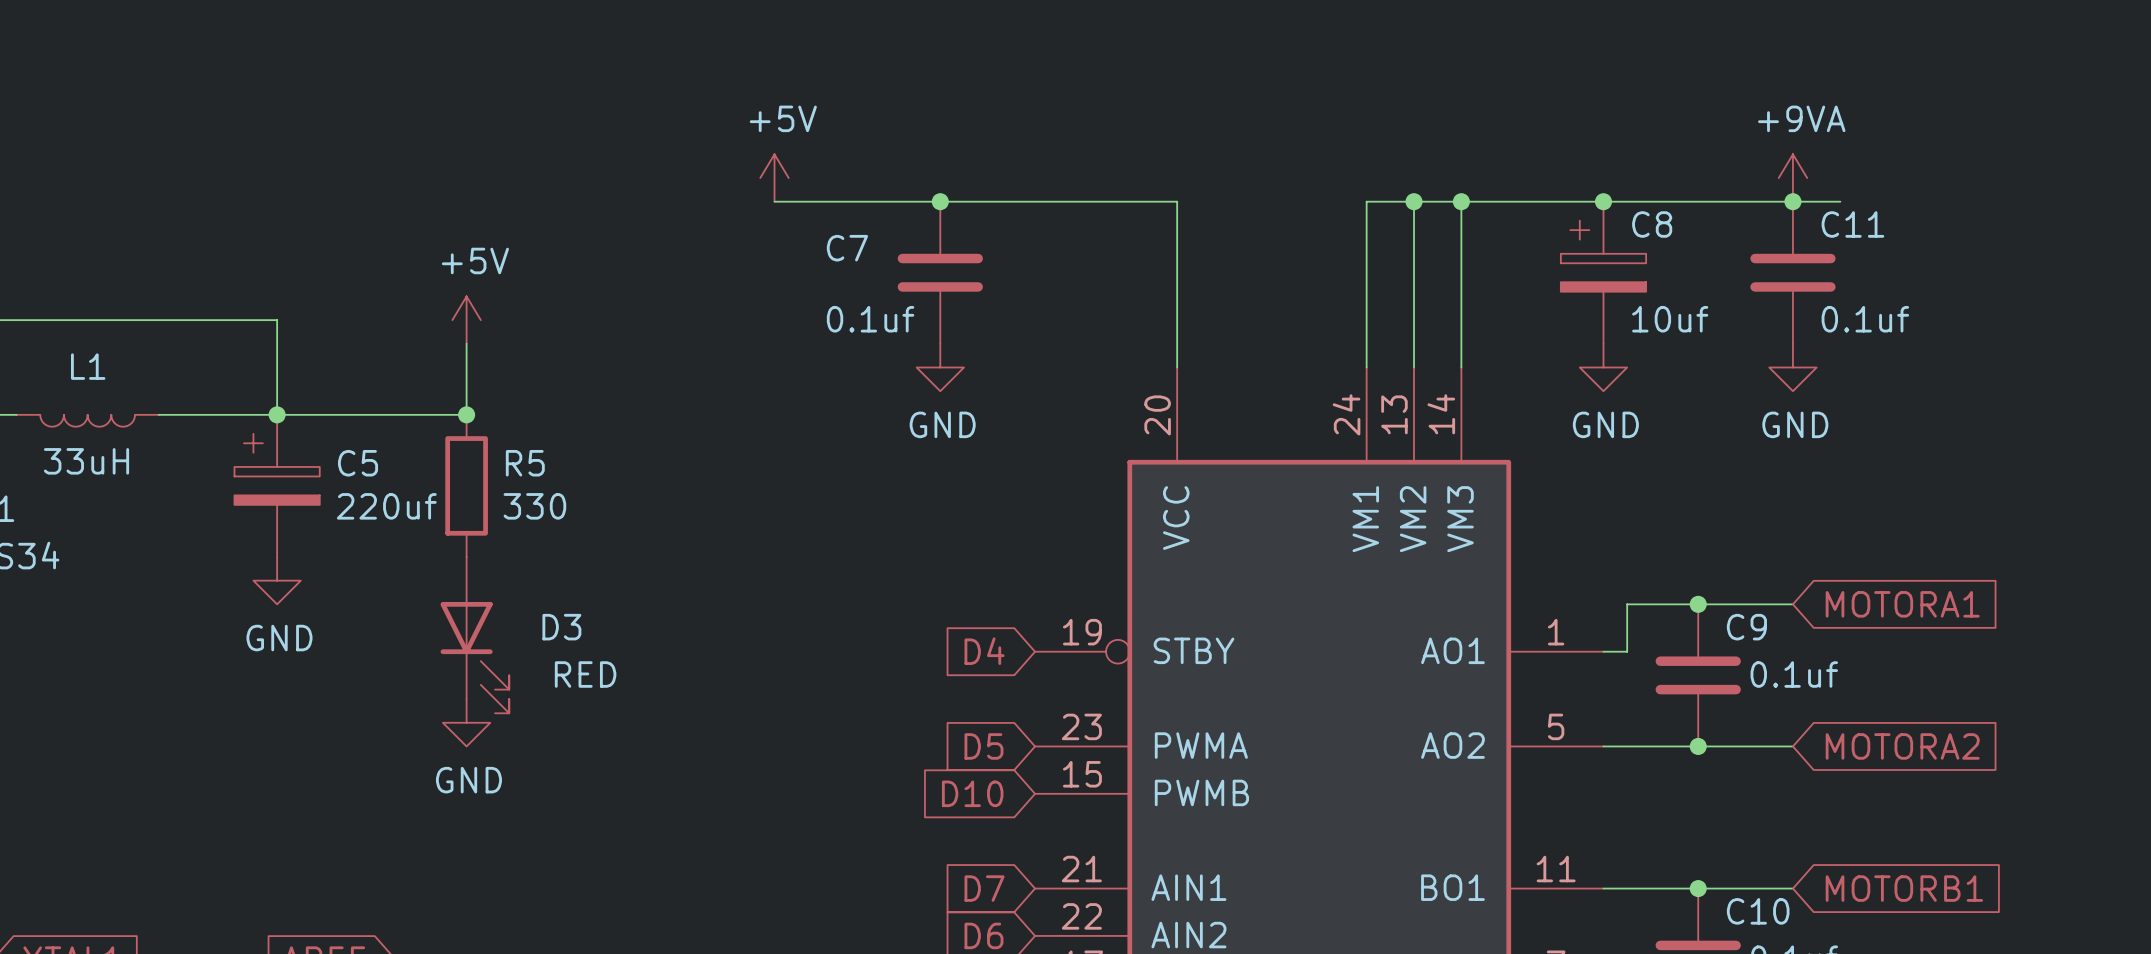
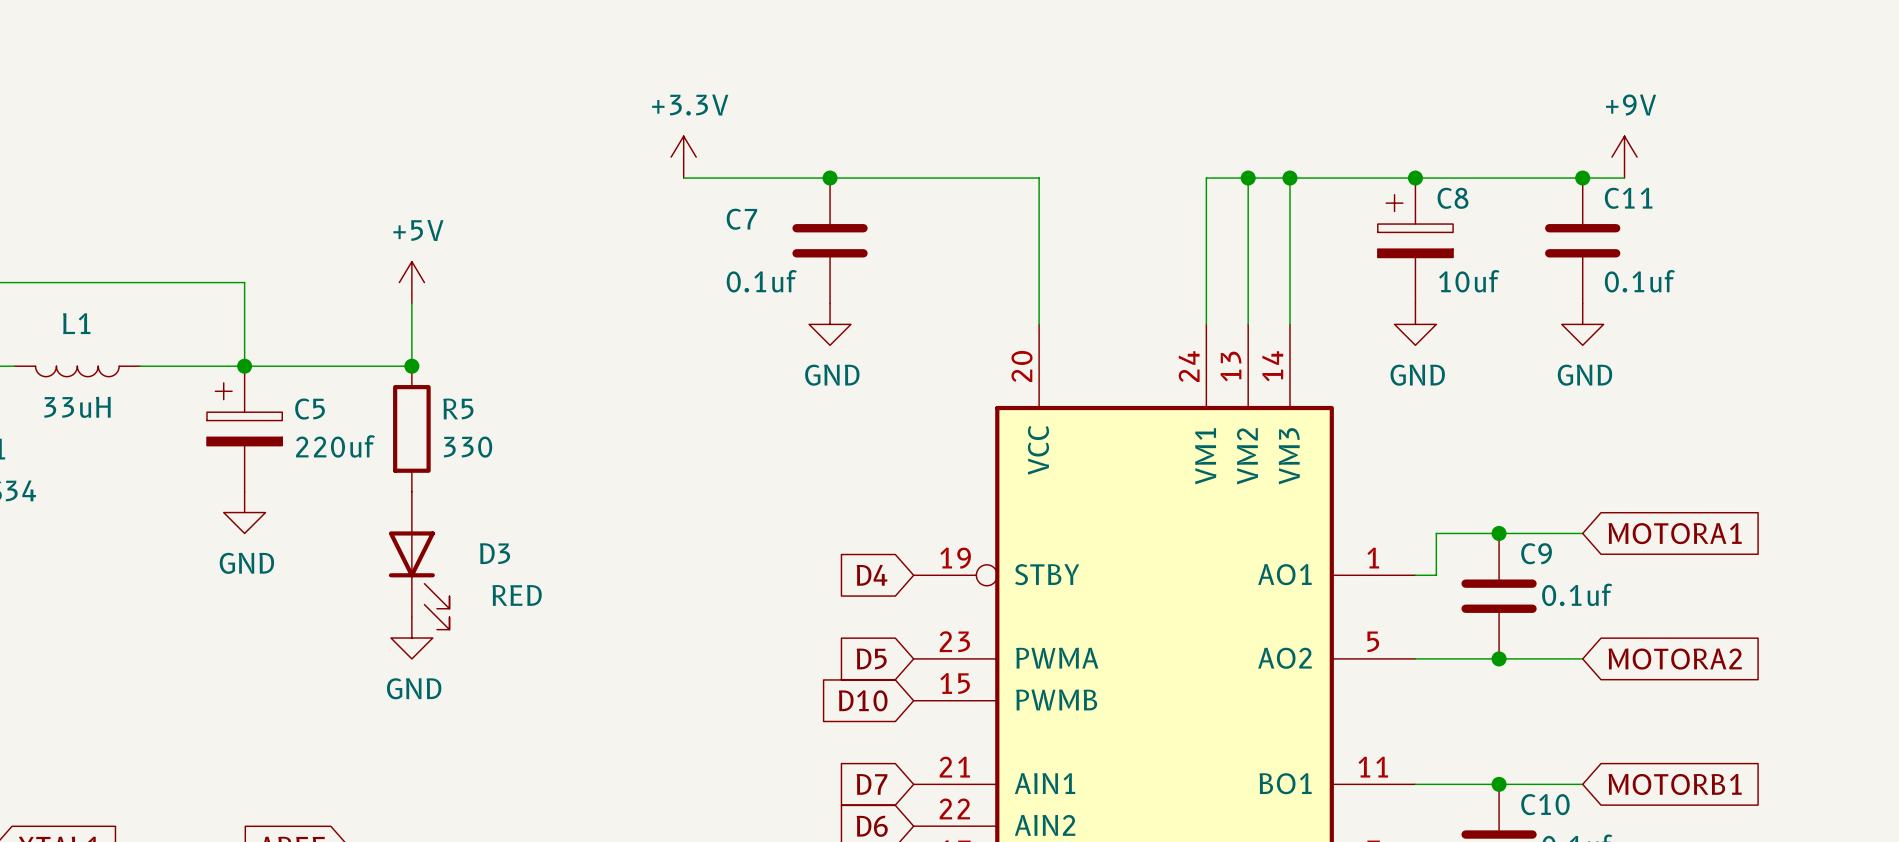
power symbol: +5V (774, 178) -> +3.3V (683, 157)
power symbol: +9VA (1792, 178) -> none
power symbol: none -> +9V (1624, 157)

